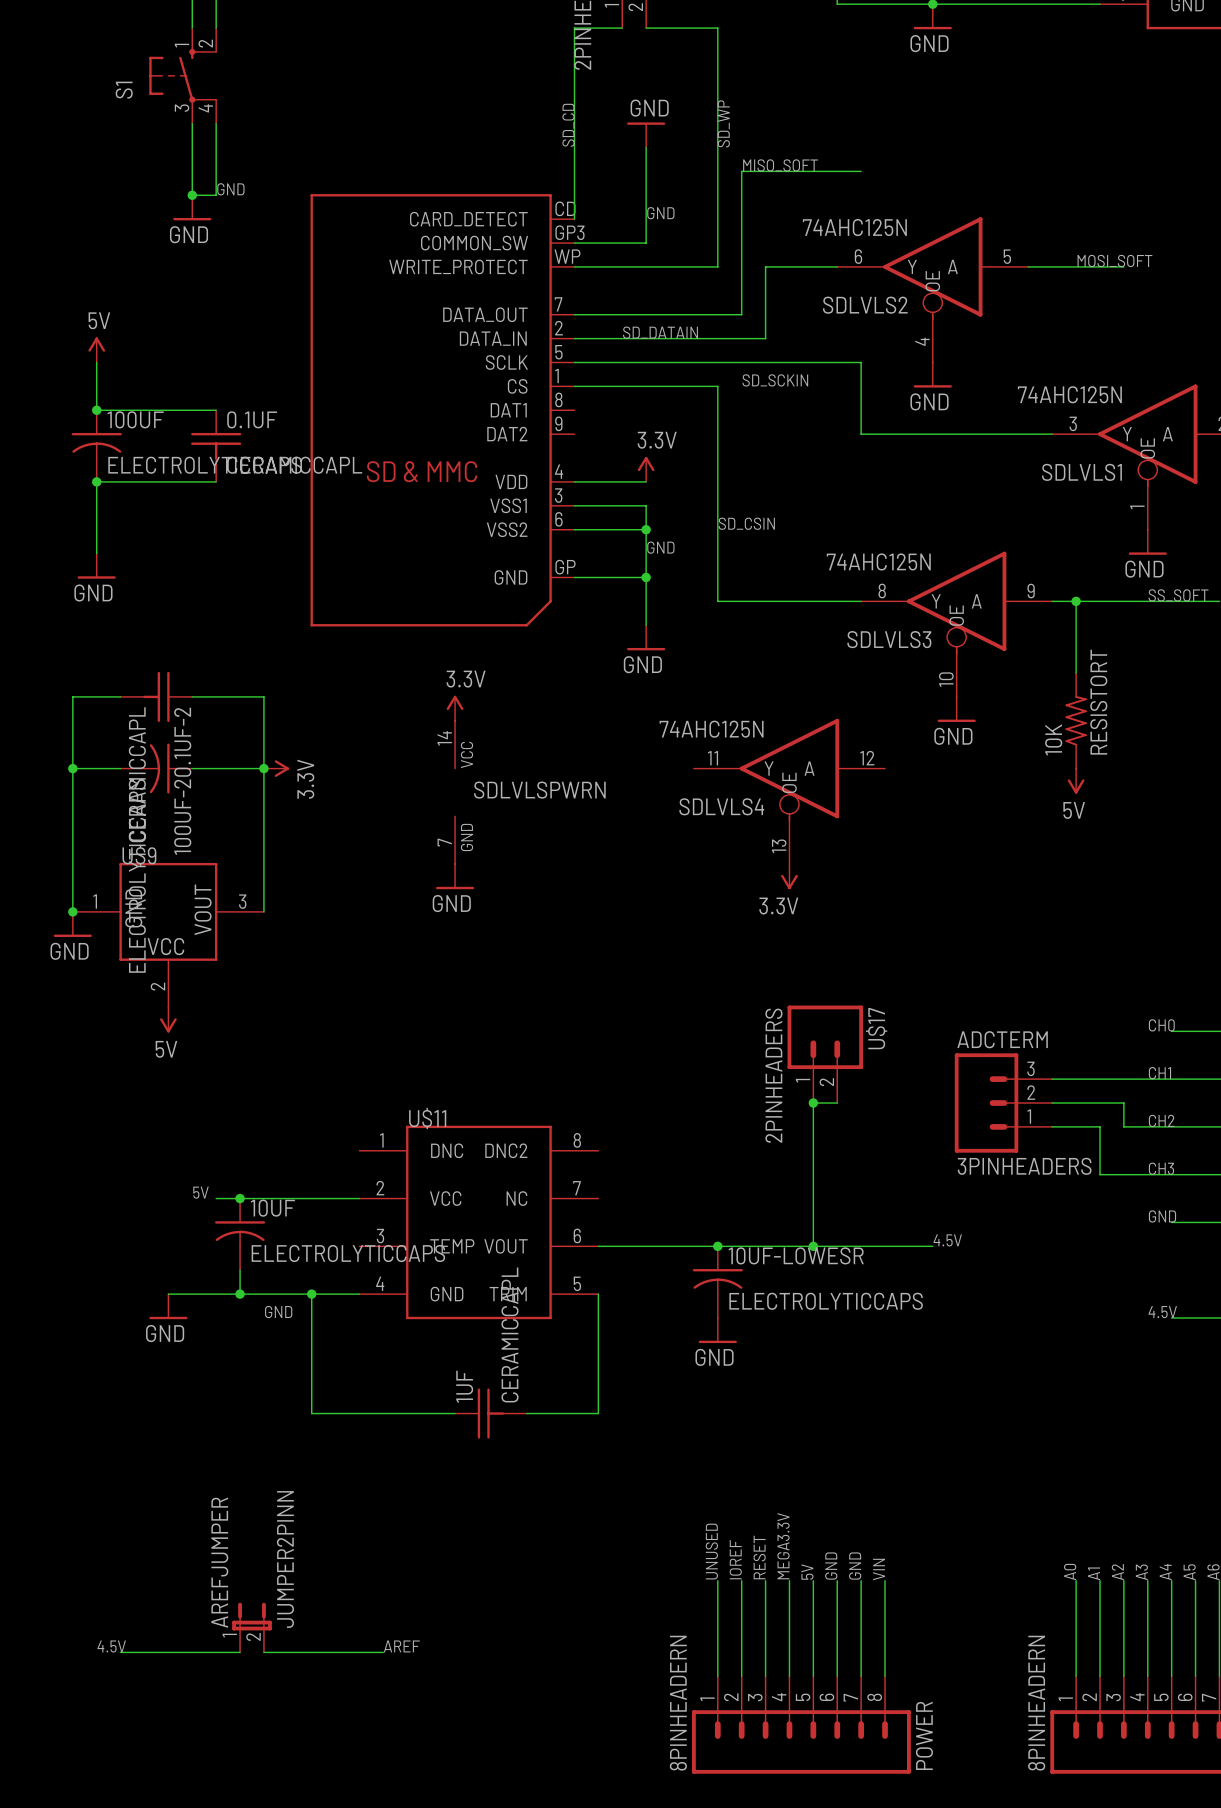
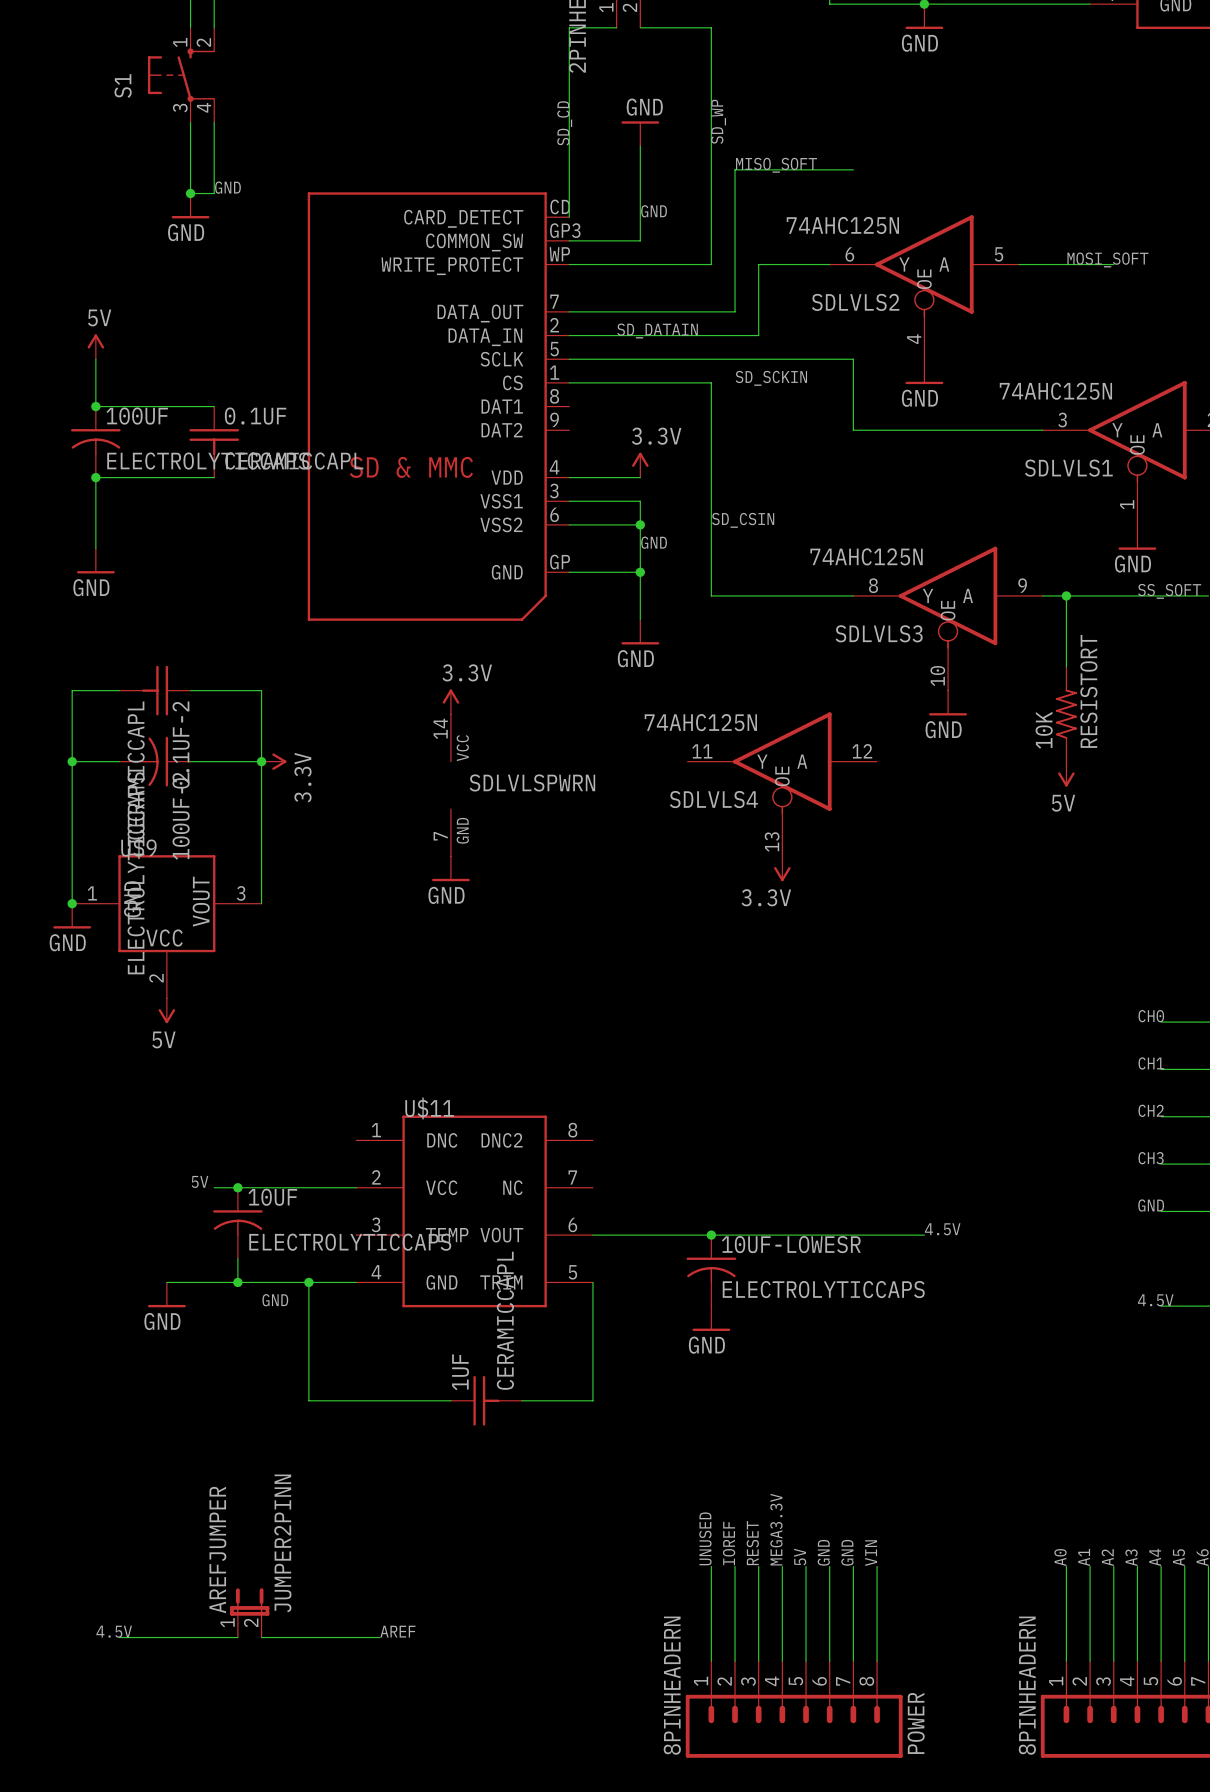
U$17: 2PINHEADERS (825, 1054) -> none
wire: (1052, 1079) (1171, 1079) -> none
junction: (813, 1103) -> none
wire: (837, 1103) (813, 1103) (813, 1246) -> none
ADCTERM: 3PINHEADERS (1003, 1103) -> none
wire: (1052, 1103) (1123, 1103) (1123, 1126) (1171, 1126) -> none
wire: (1052, 1126) (1100, 1126) (1100, 1174) (1171, 1174) -> none
junction: (813, 1246) -> none

